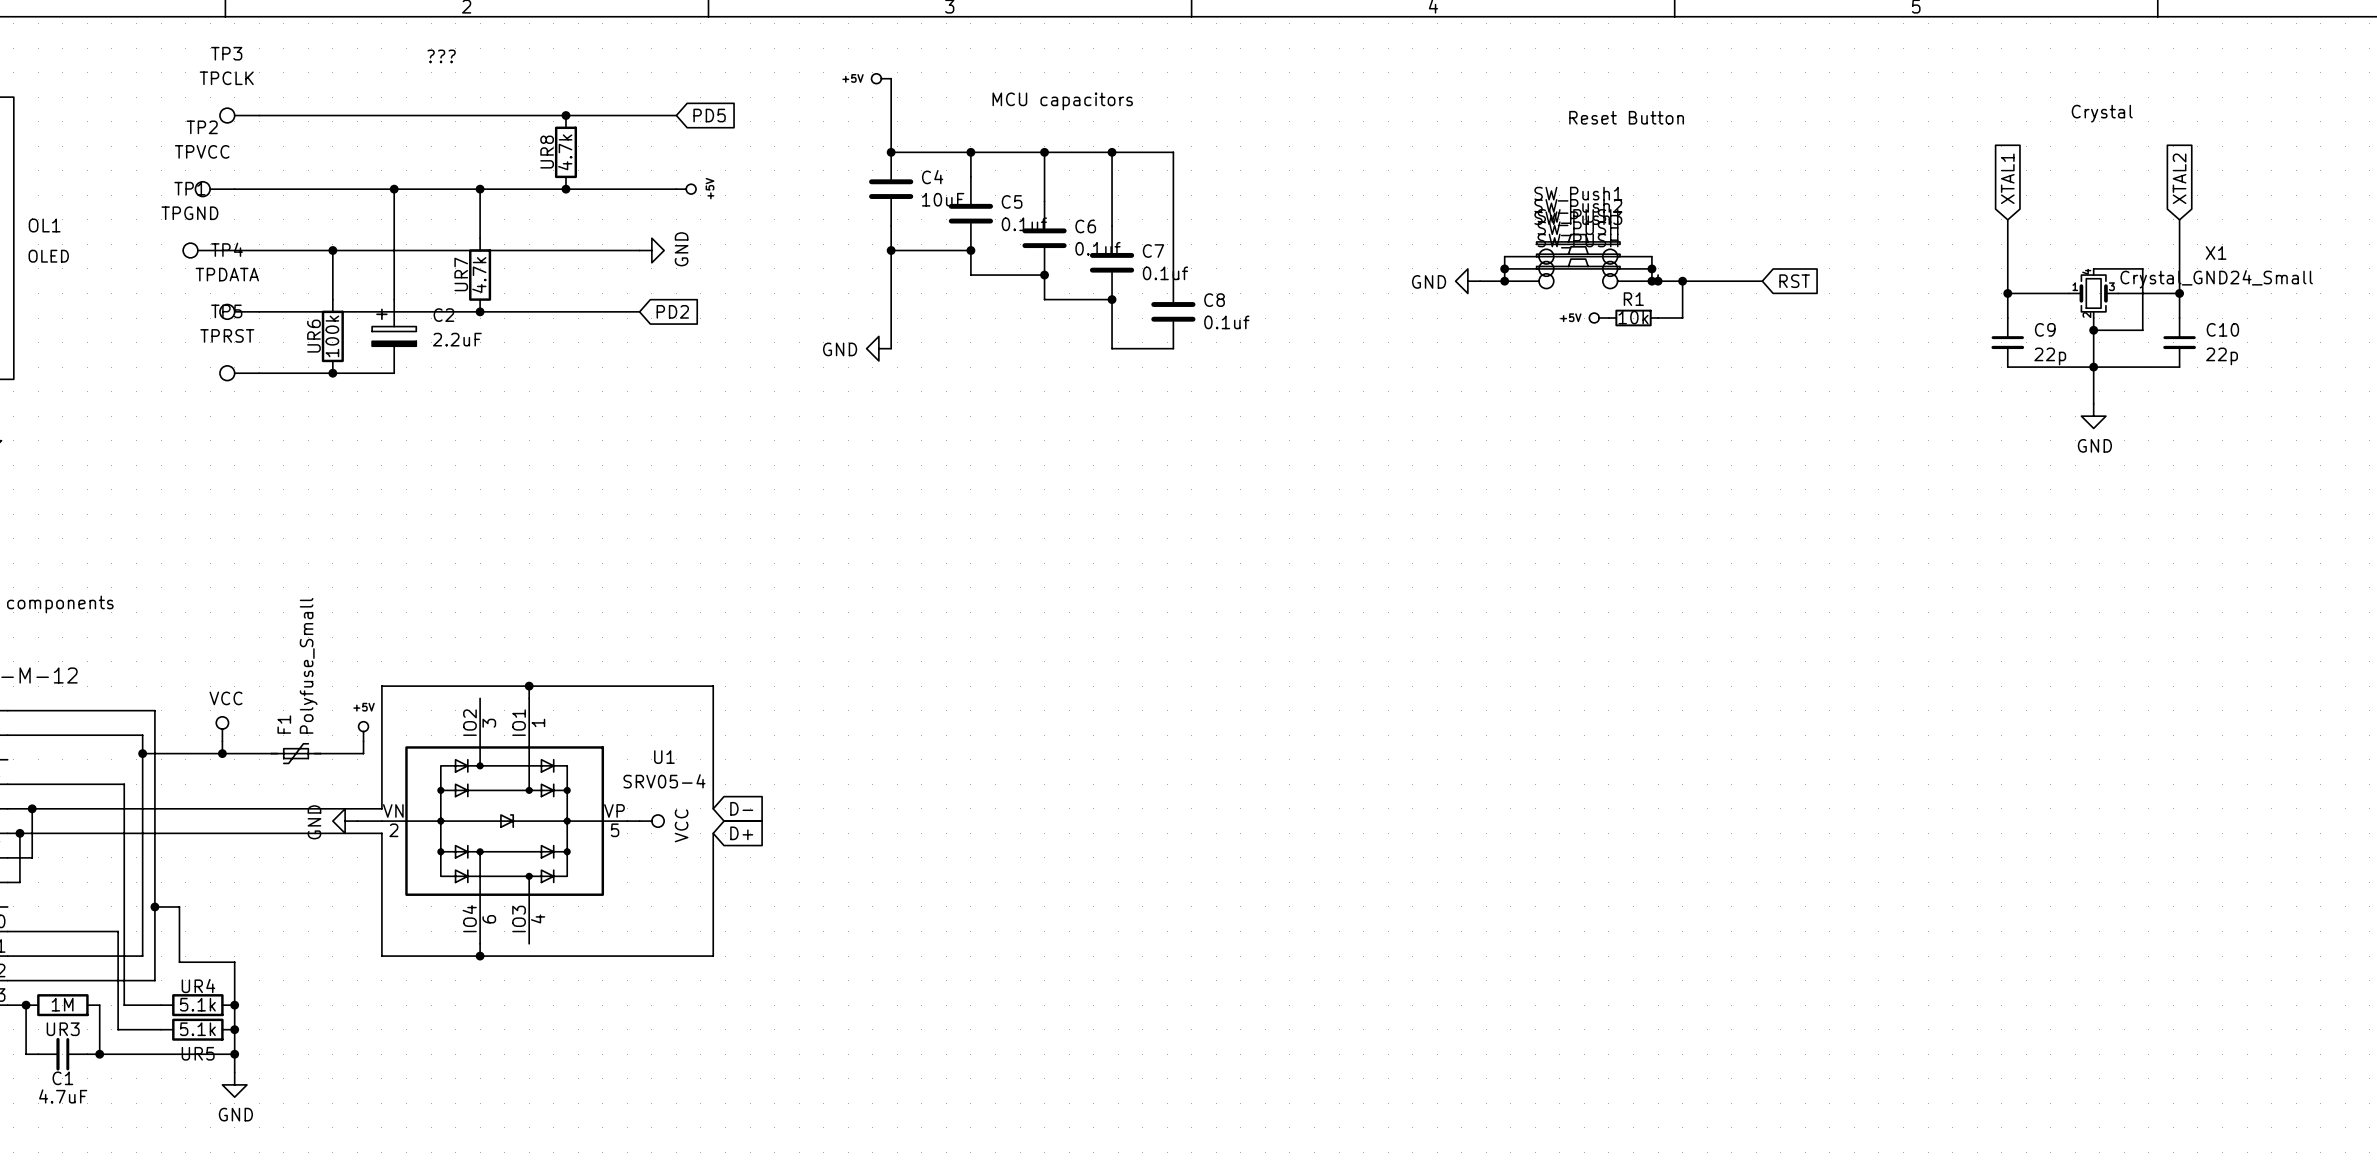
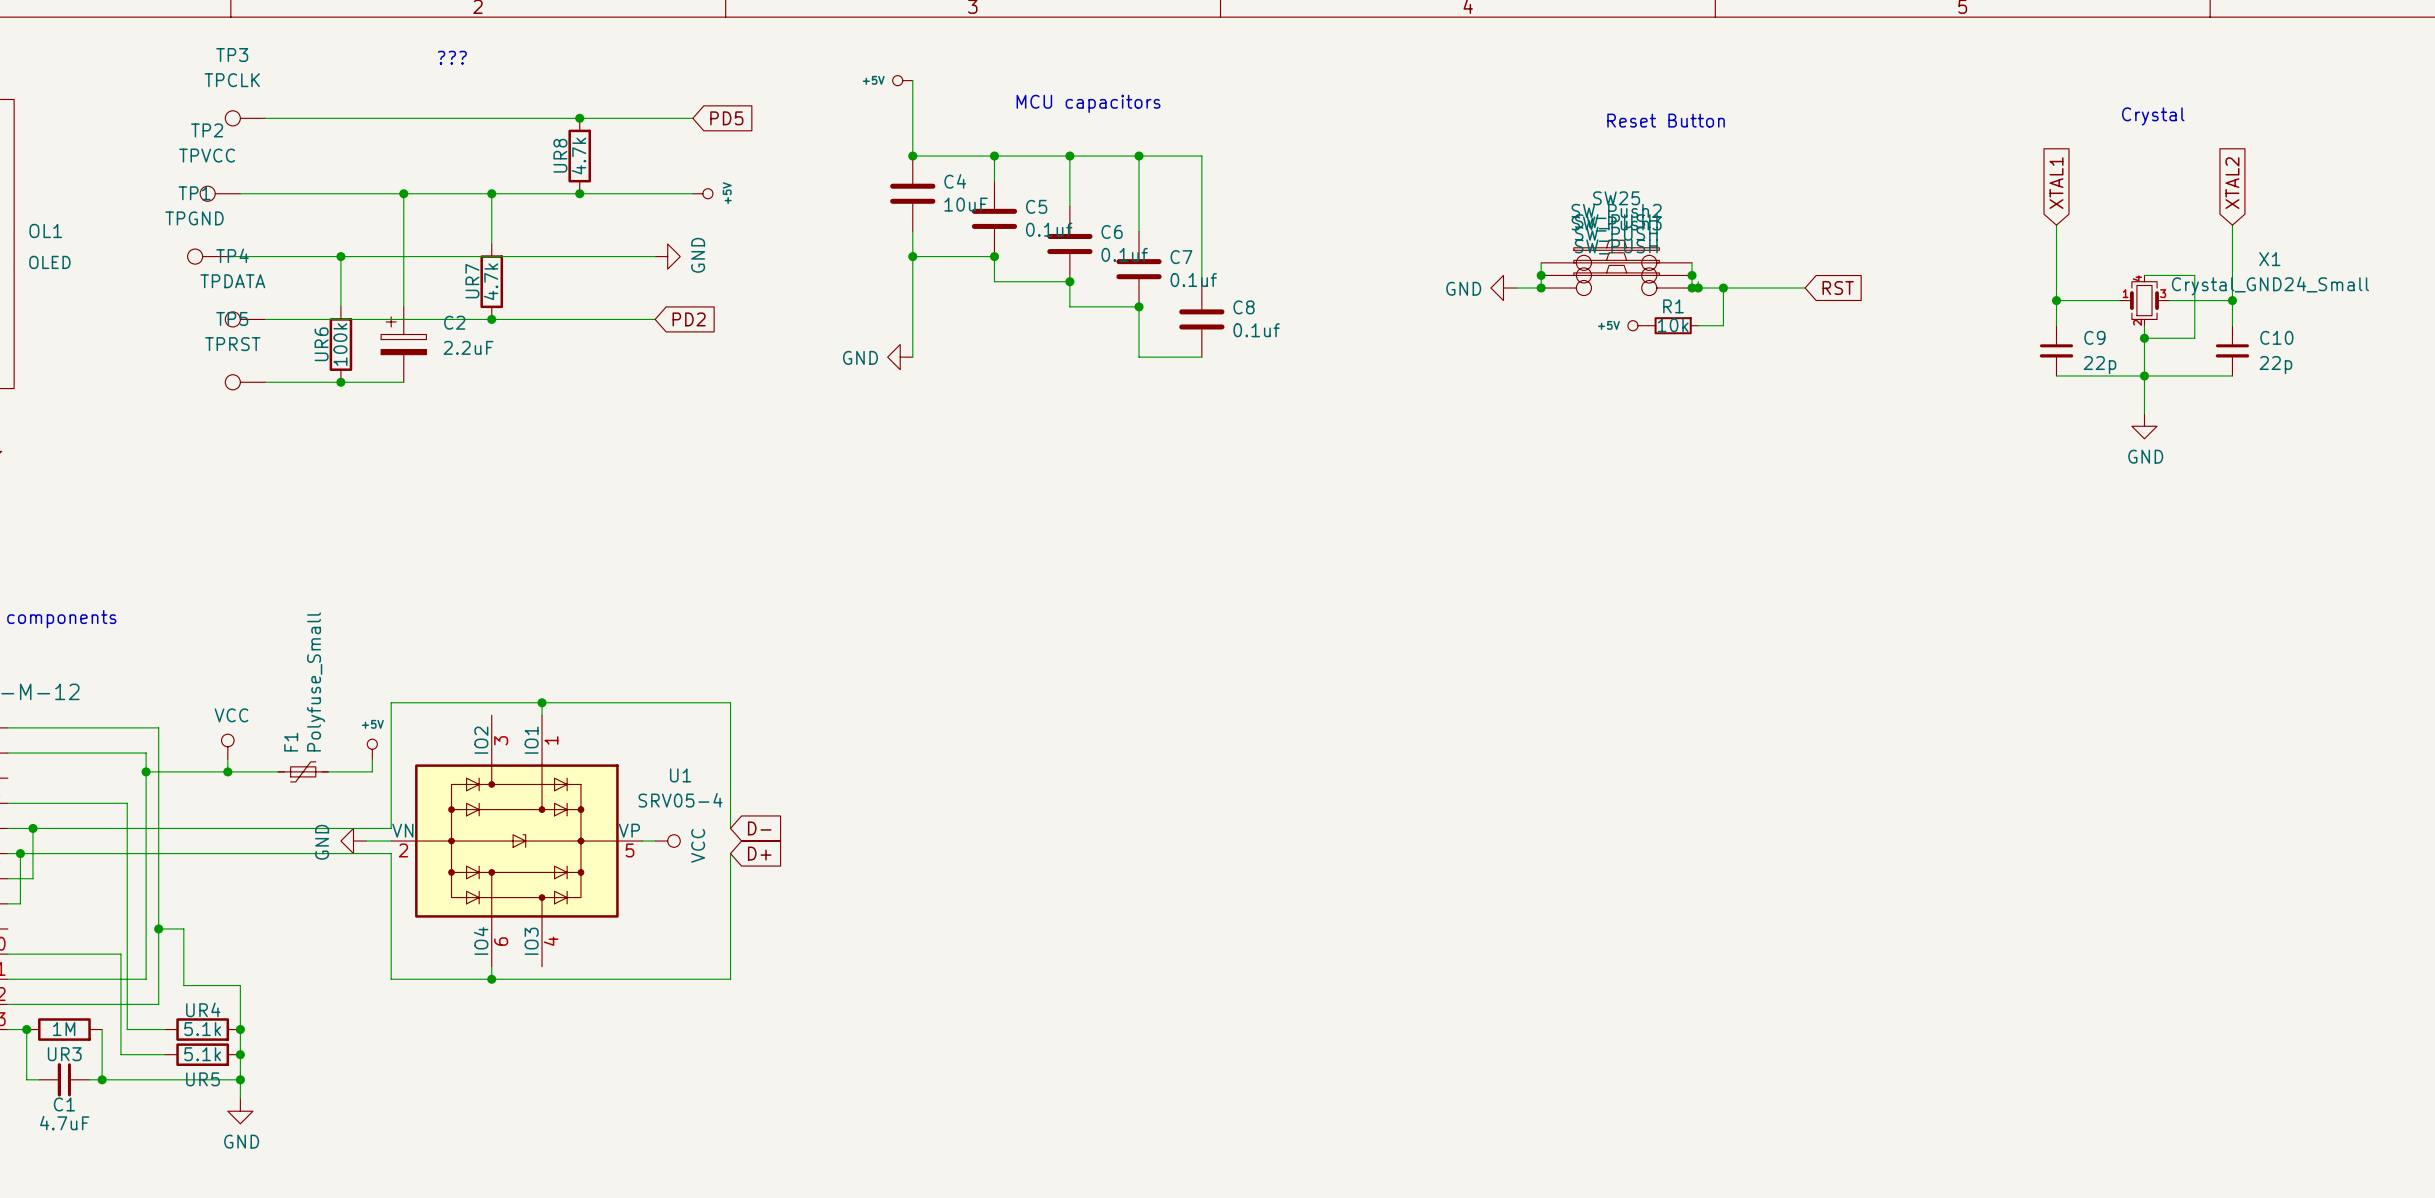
SW_Push1 name: SW_Push1 (1578, 194) -> SW25 (1616, 198)

